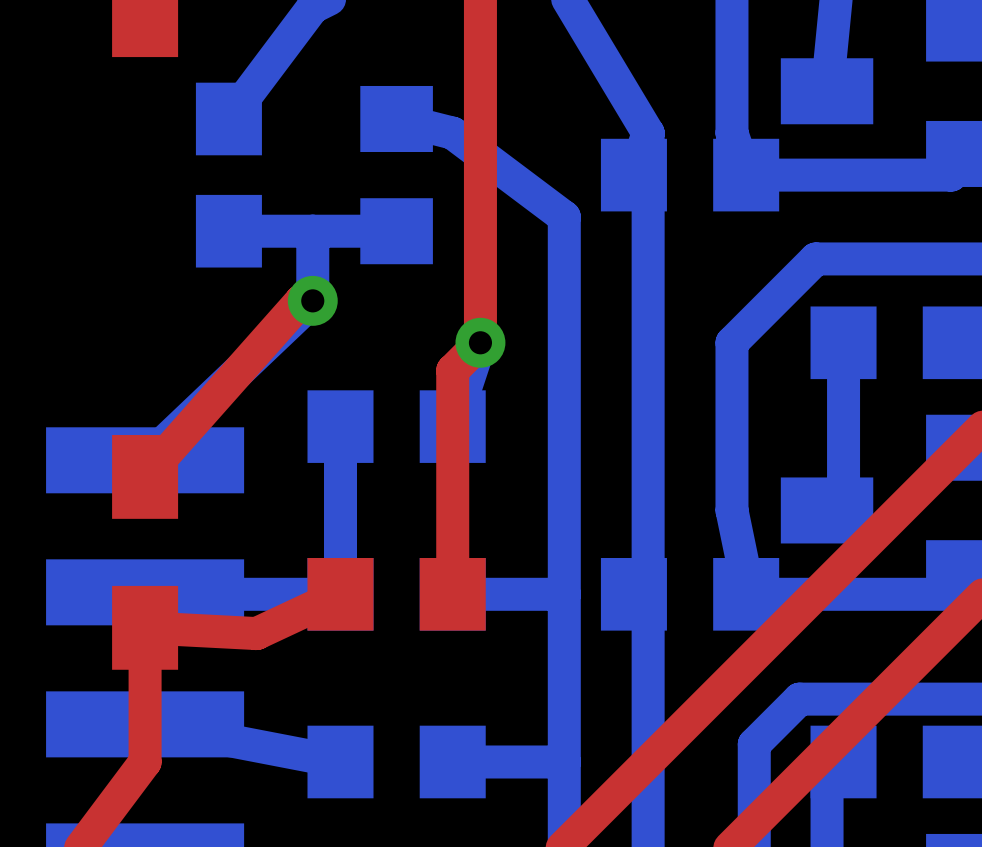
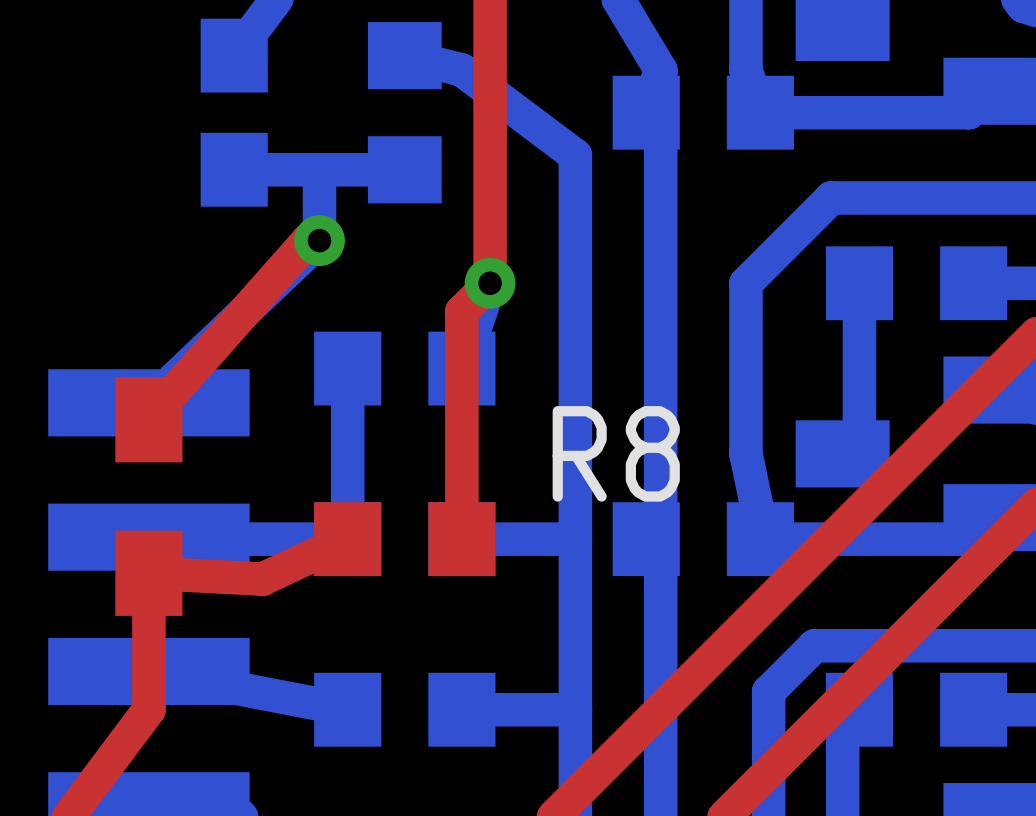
R8 name: none -> R8 (616, 453)

